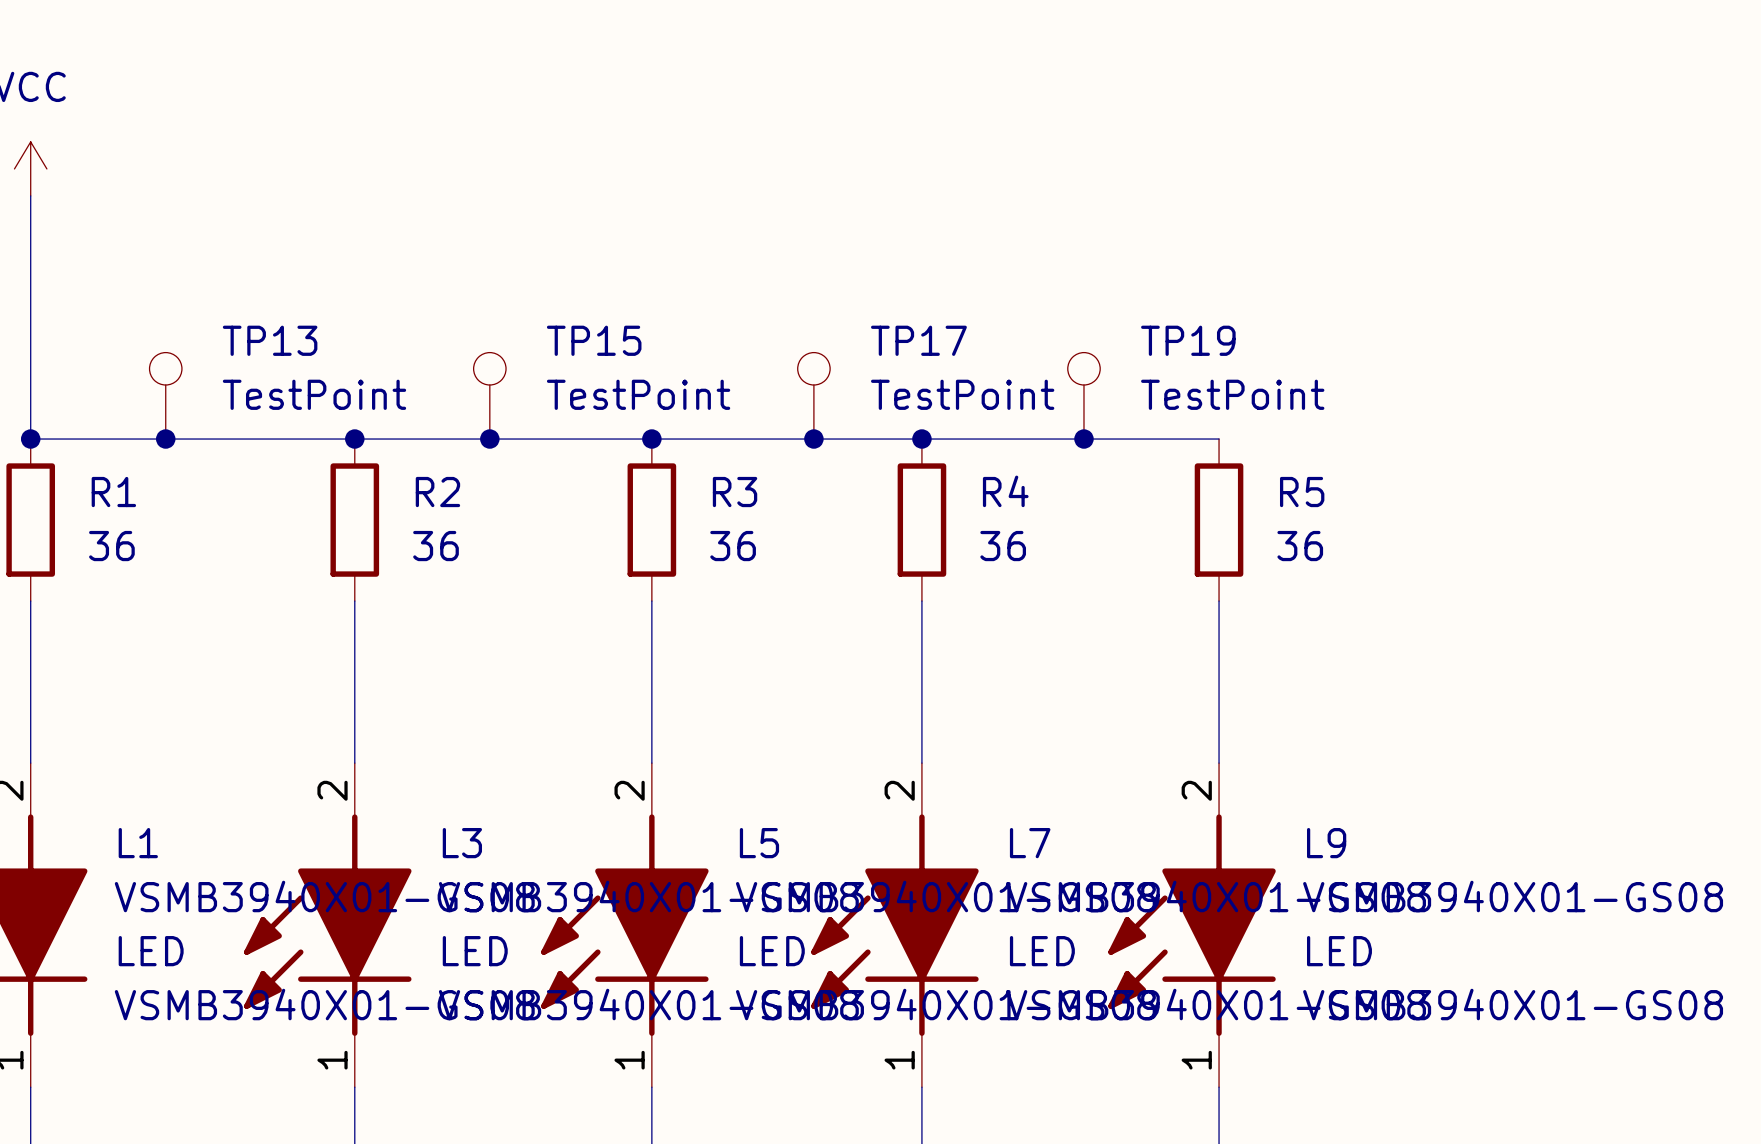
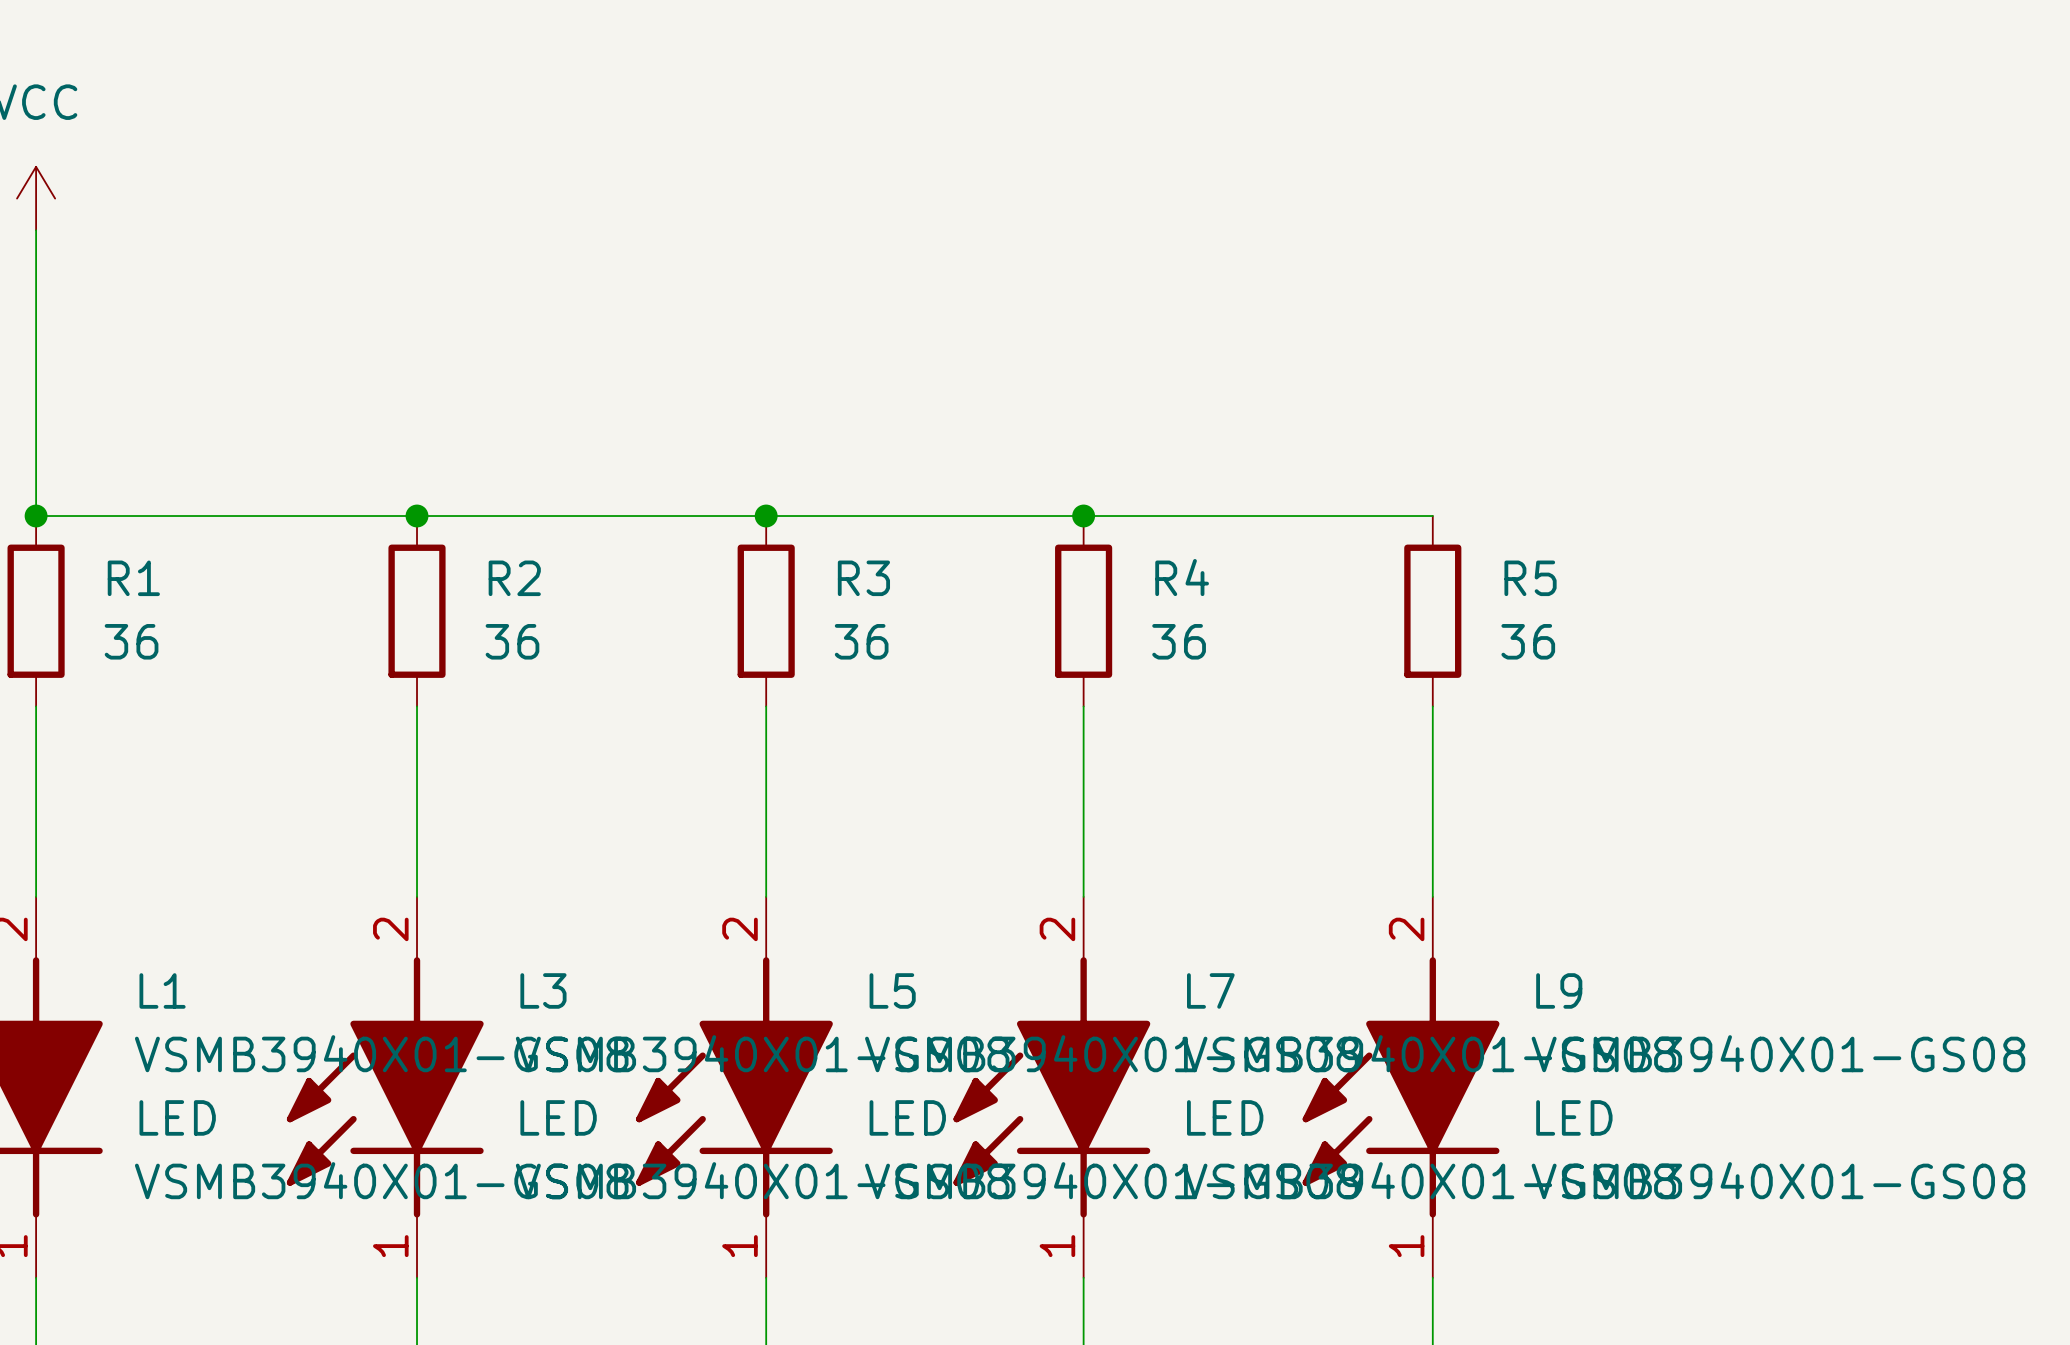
TP13: TestPoint (165, 395) -> none
TP15: TestPoint (489, 395) -> none
TP17: TestPoint (813, 395) -> none
TP19: TestPoint (1083, 395) -> none
junction: (165, 439) -> none
junction: (489, 439) -> none
junction: (813, 439) -> none
junction: (1083, 439) -> none

